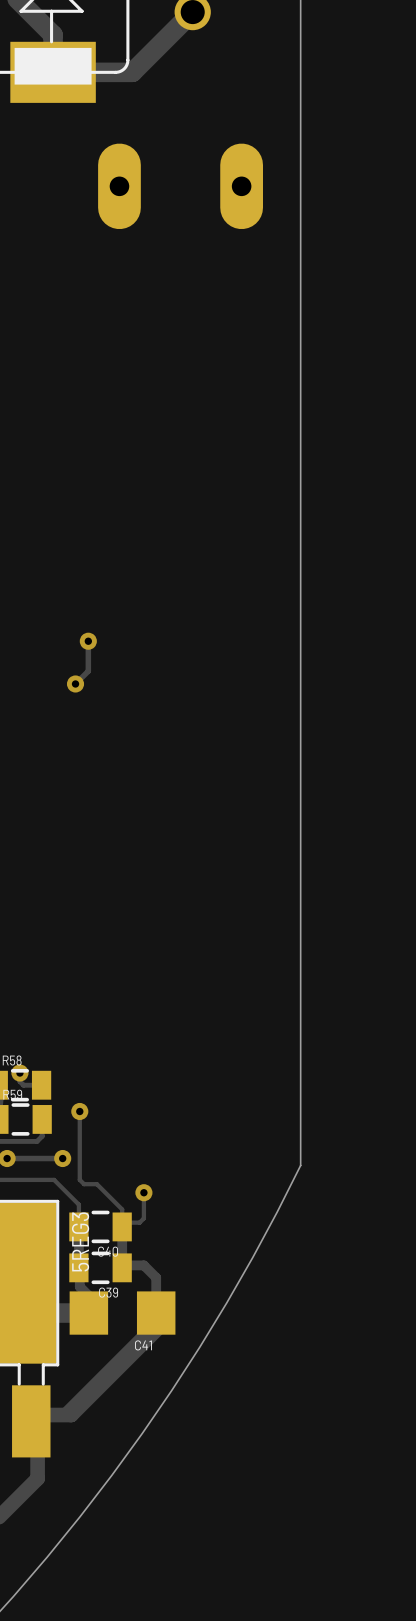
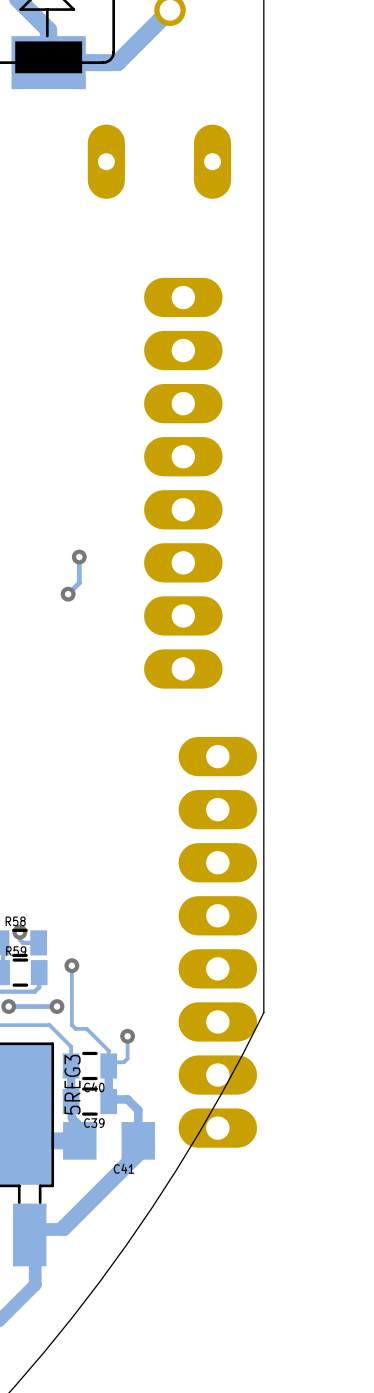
part: none -> (183, 483)
part: none -> (217, 942)

